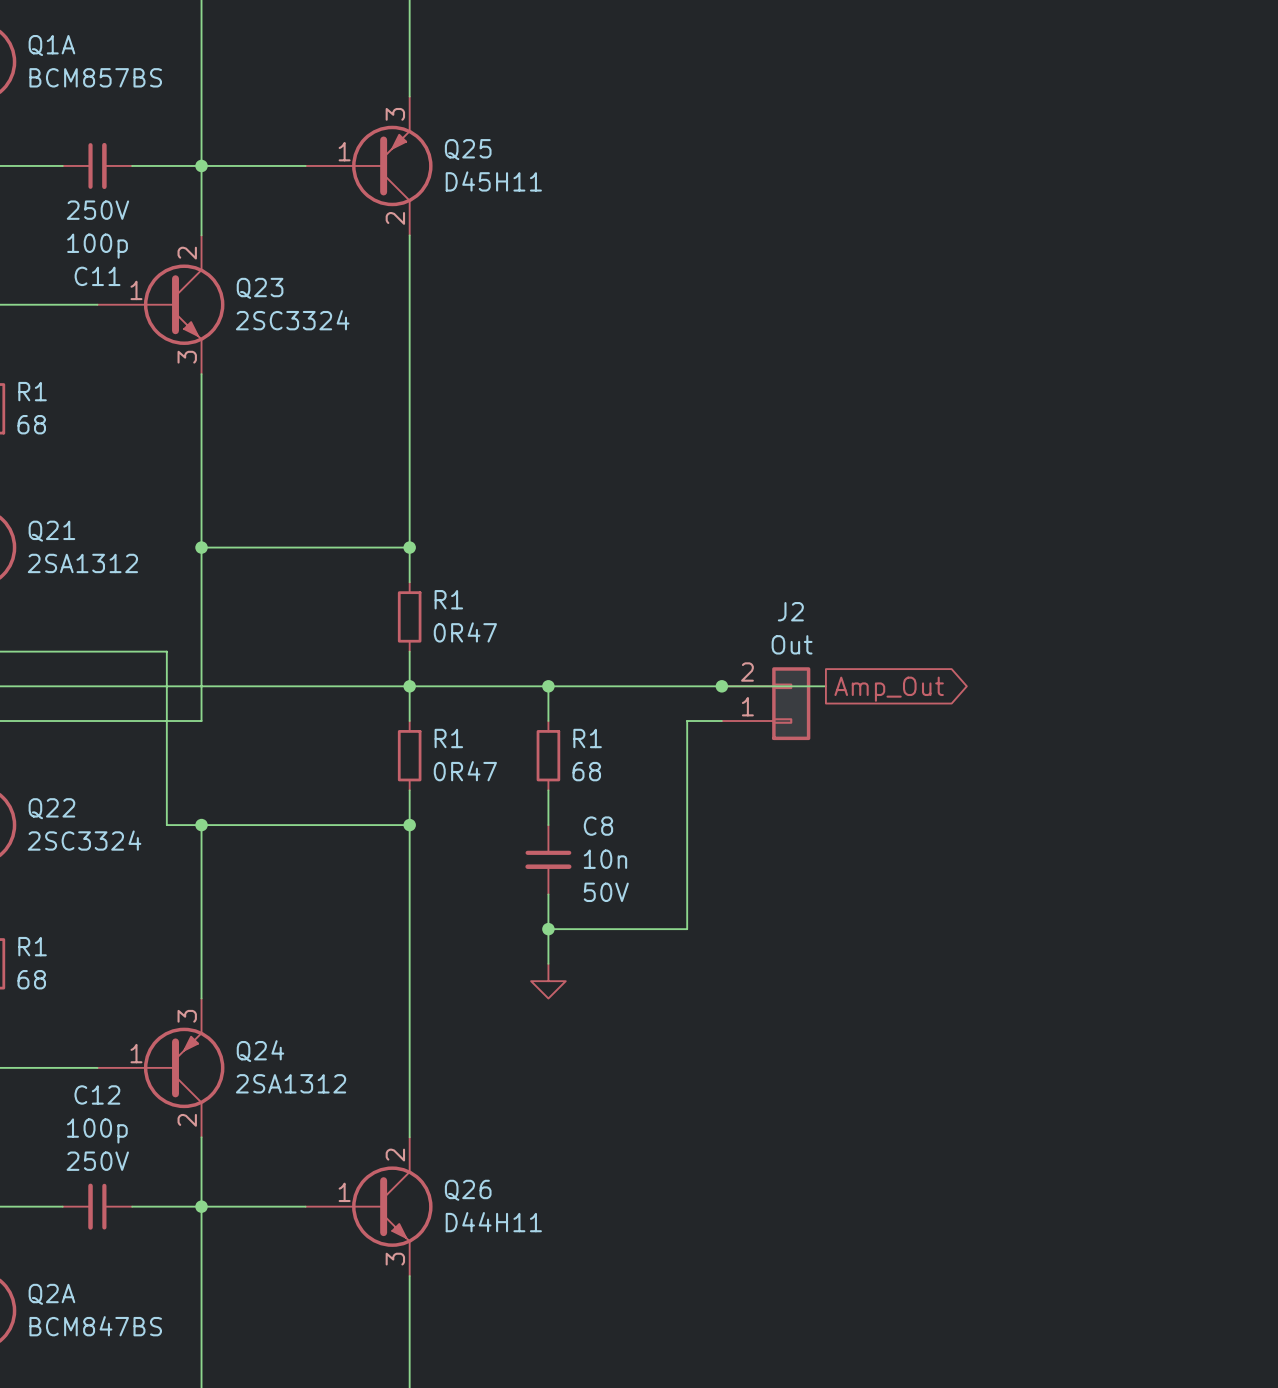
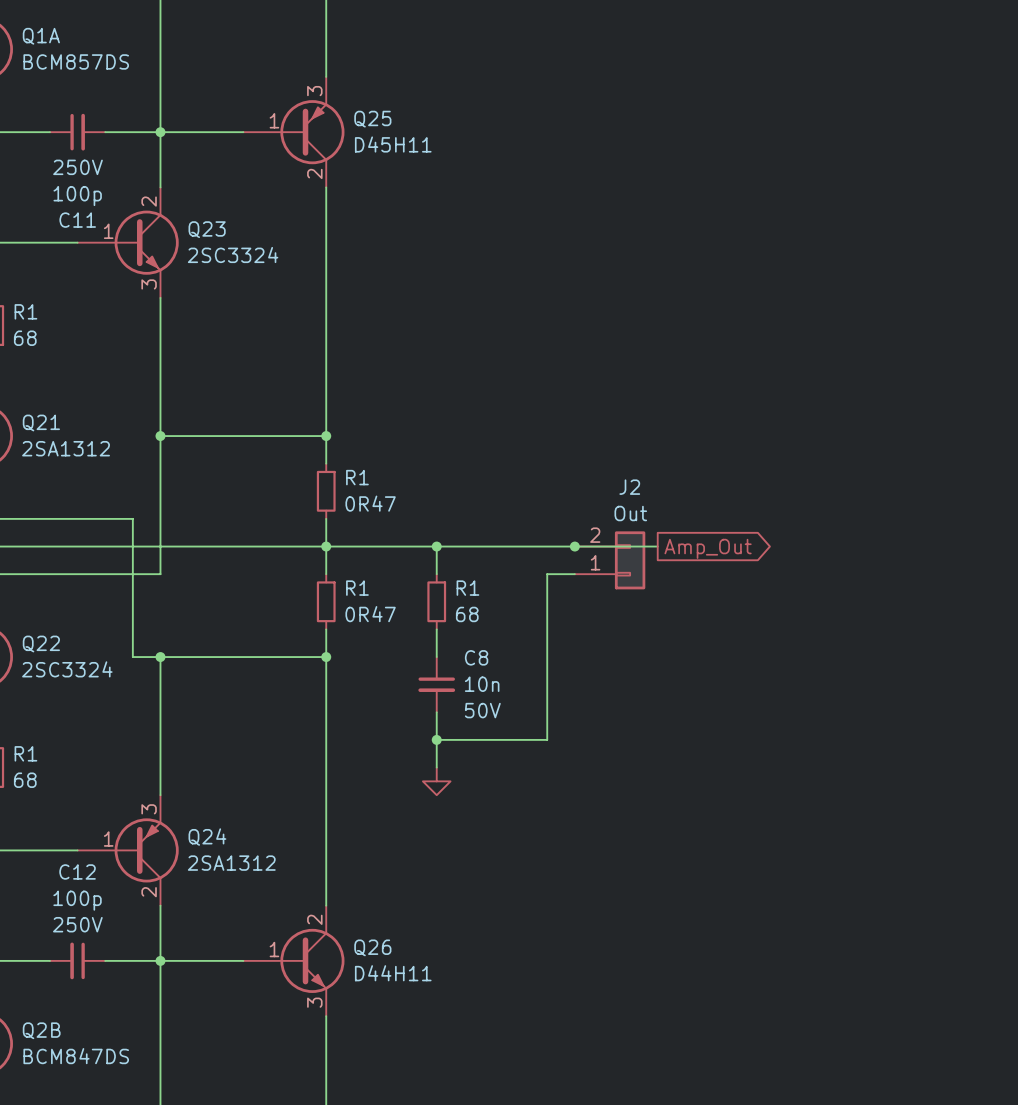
Q1A value: BCM857BS (95, 77) -> BCM857DS (76, 61)
Q2A name: Q2A (51, 1294) -> Q2B (41, 1030)
Q2A value: BCM847BS (95, 1326) -> BCM847DS (76, 1056)

